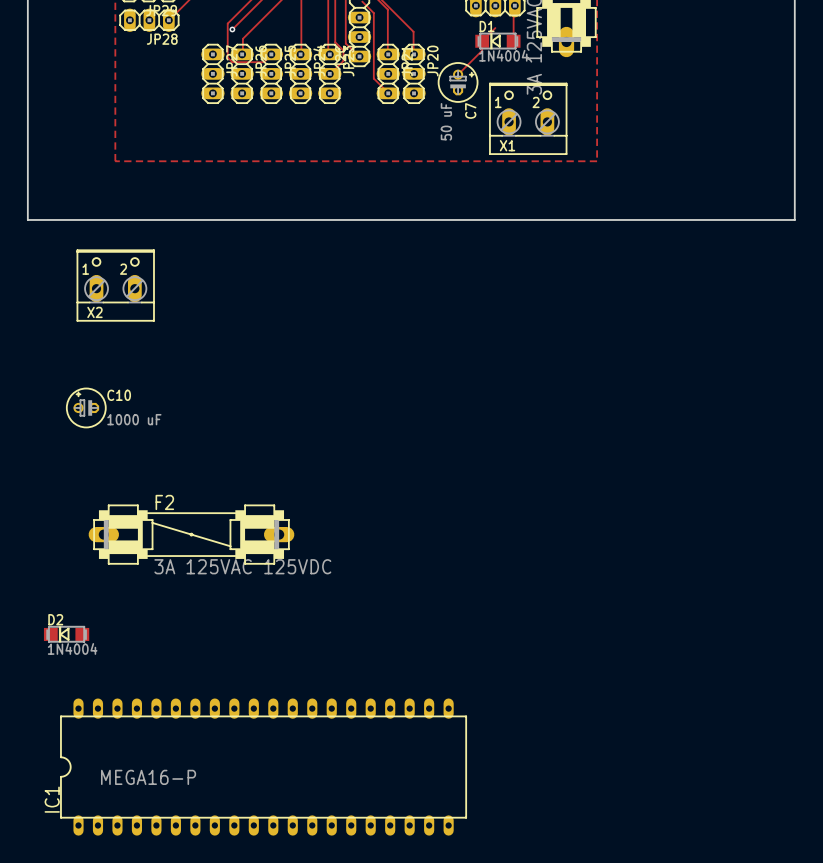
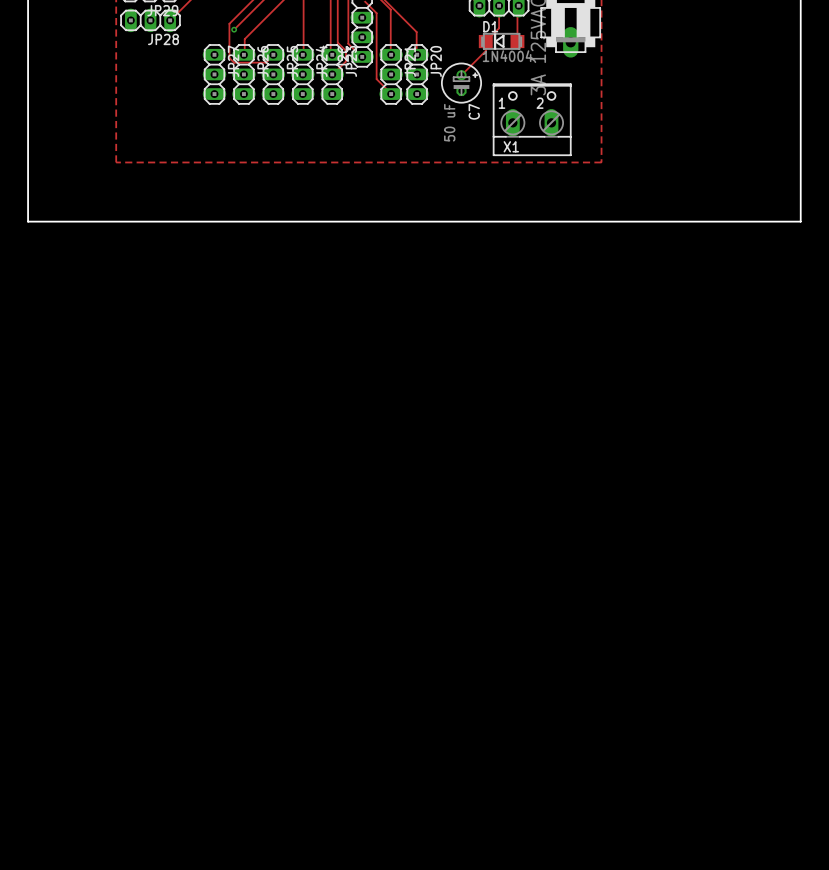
track: none -> (499, 5) (499, 28)
X2: (115, 285) -> none
C10: 1000 uF (86, 407) -> none
F2: 3A 125VAC 125VDC (191, 534) -> none
D2: 1N4004 (66, 634) -> none
IC1: MEGA16-P (263, 767) -> none

